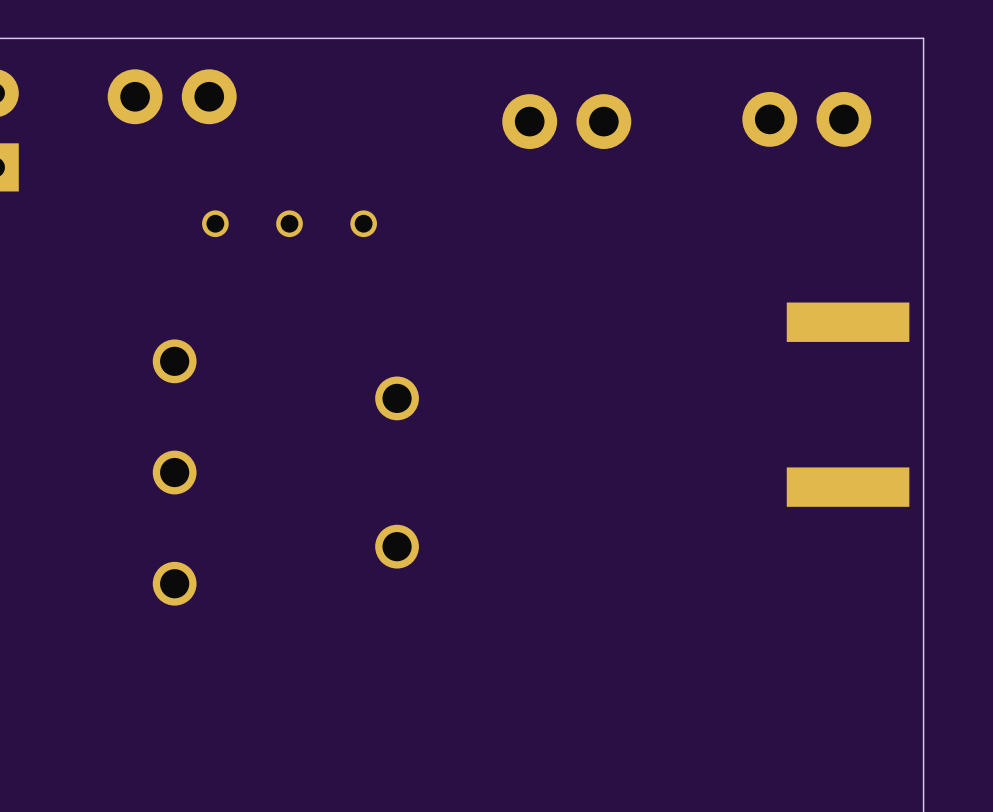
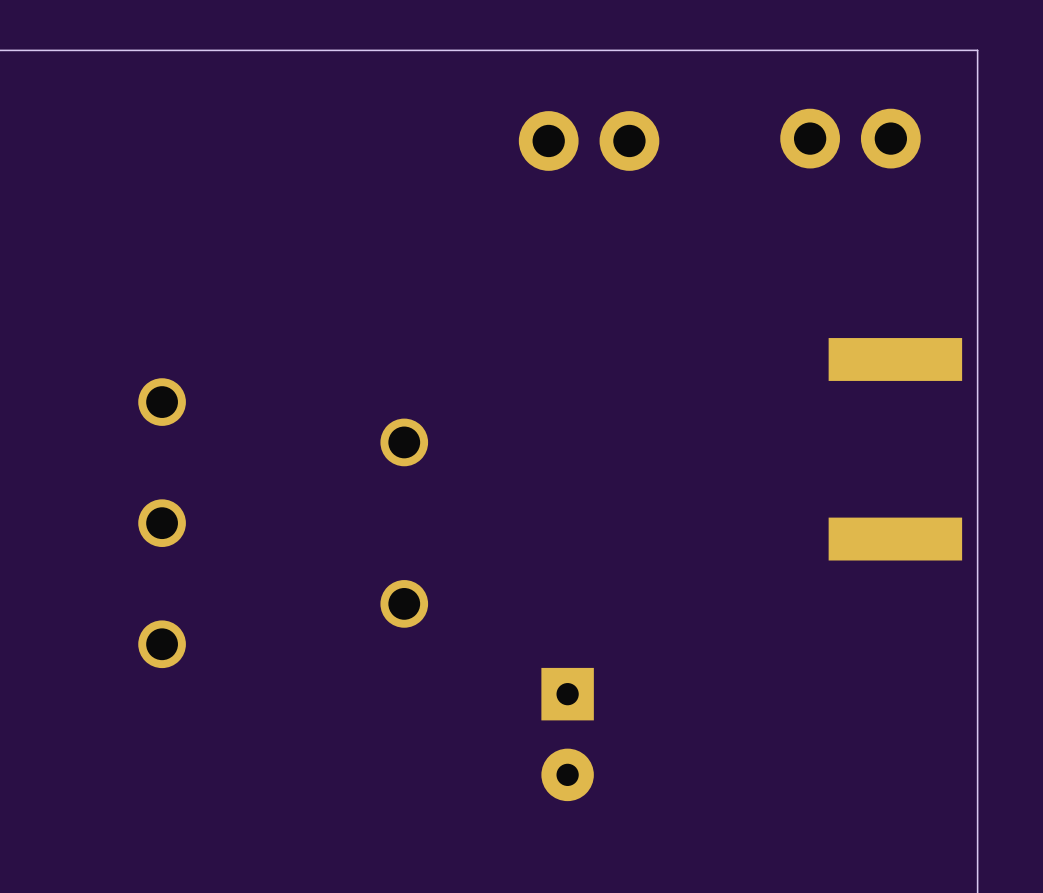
part: (172, 96) -> none
part: (289, 223) -> none
part: none -> (567, 734)

